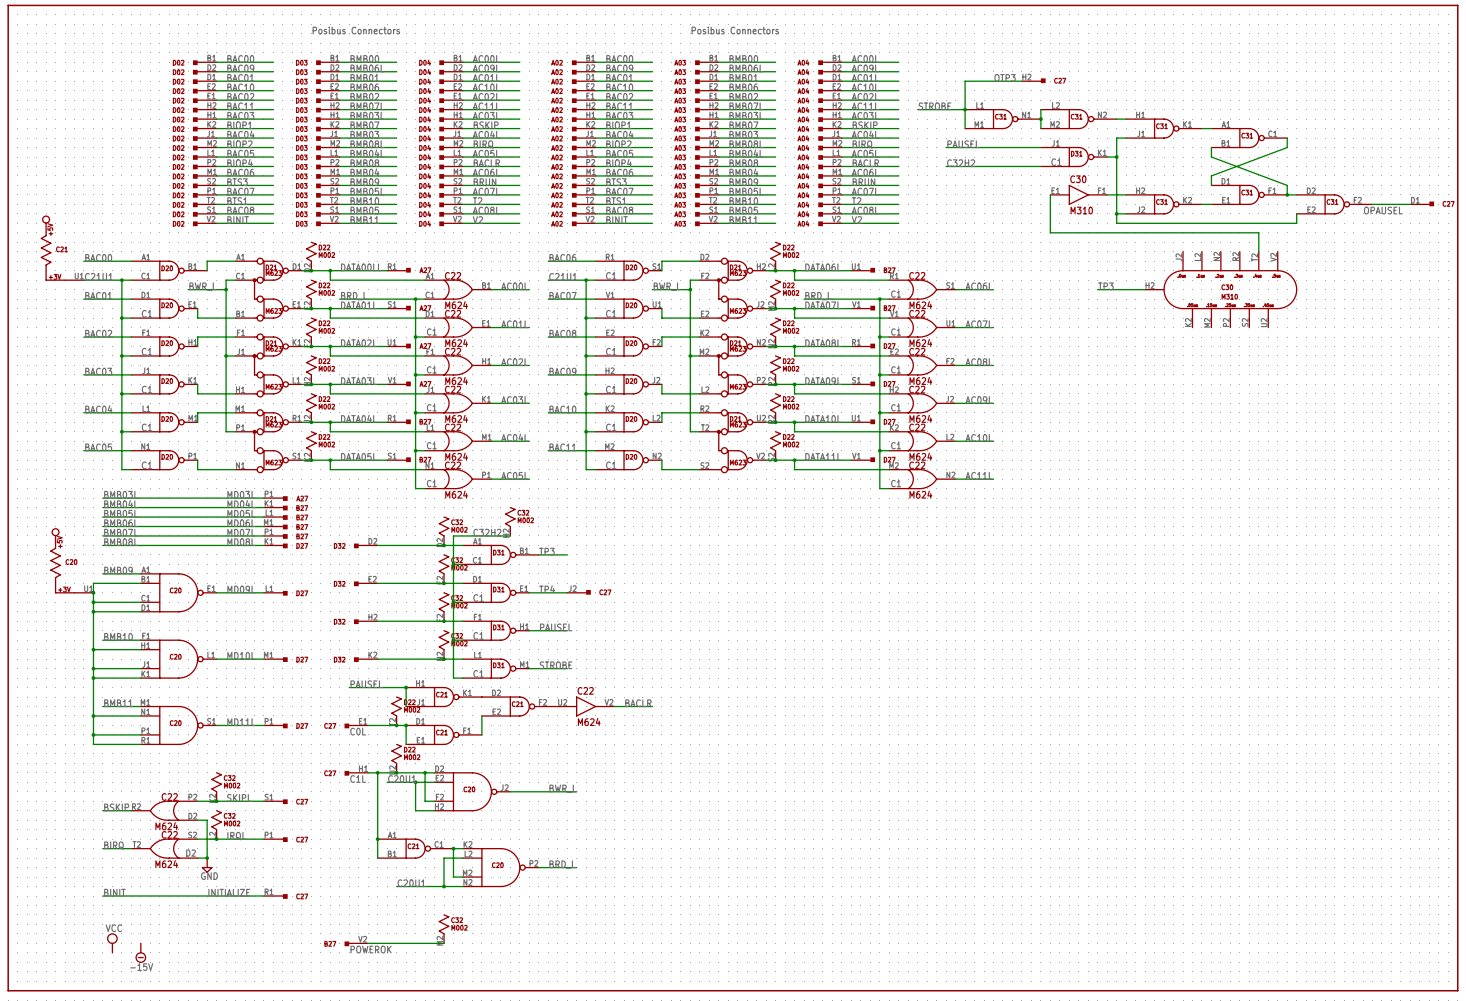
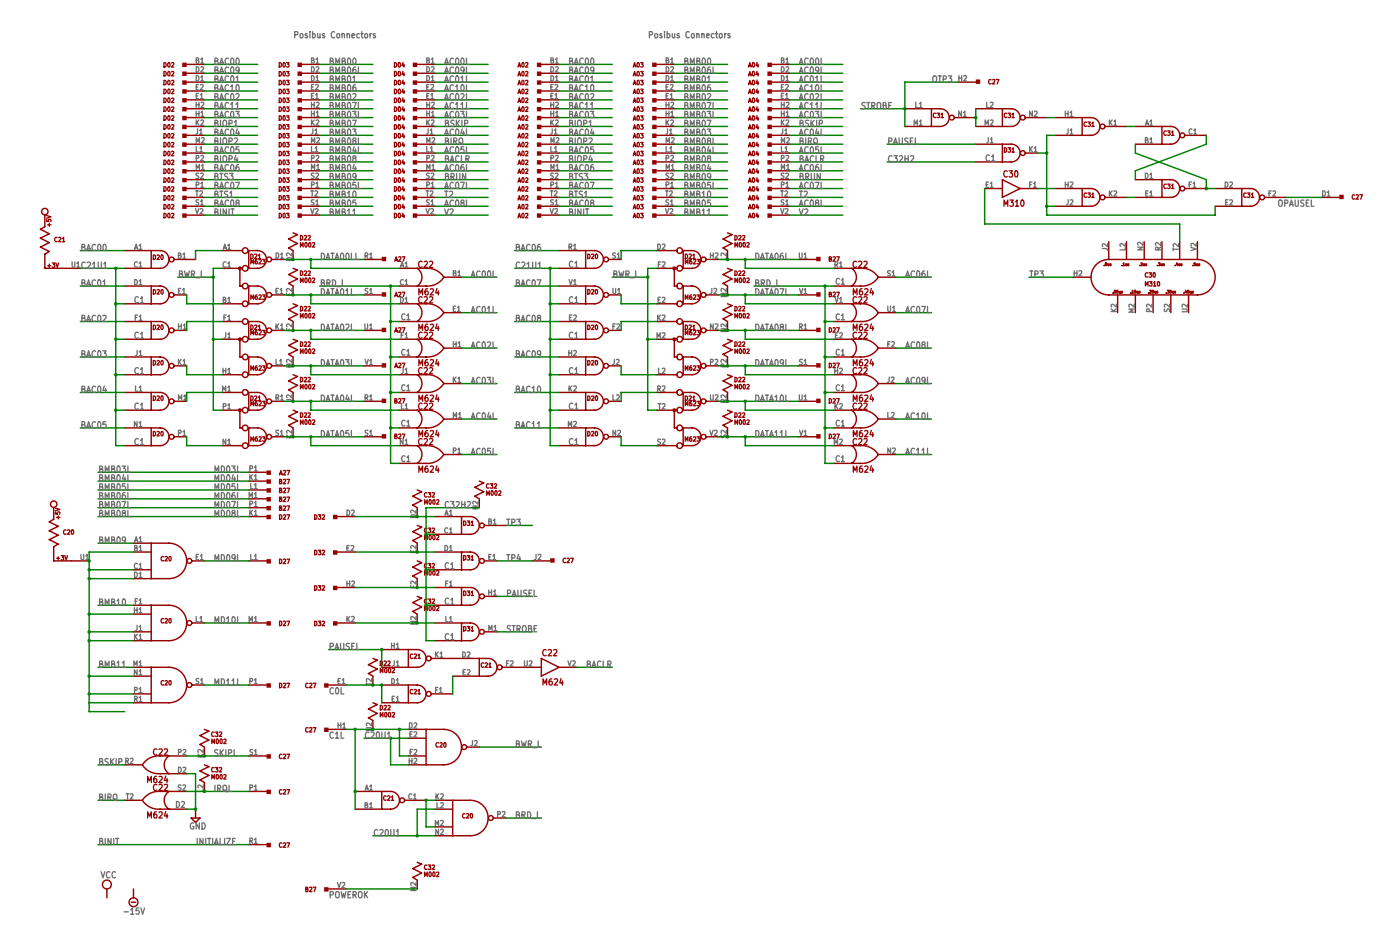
part: (732, 498) -> none
wire: none -> (89, 702) (89, 711) (124, 711)

